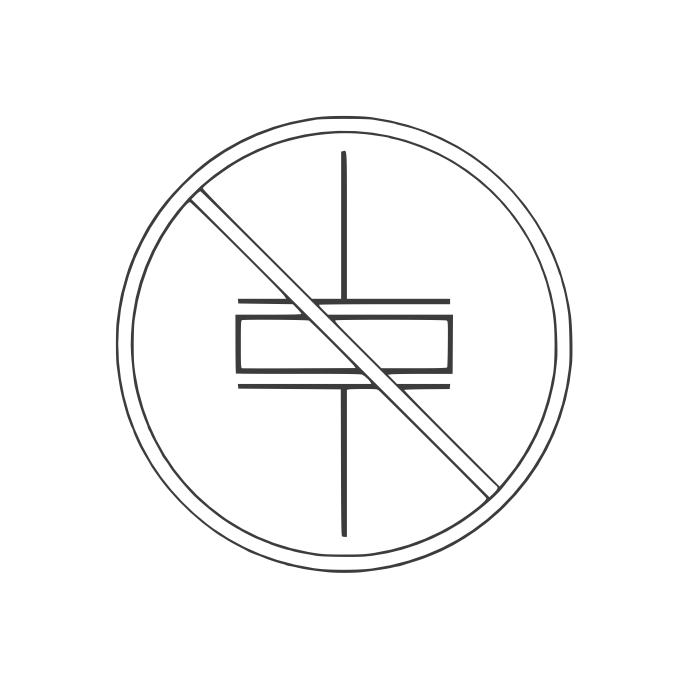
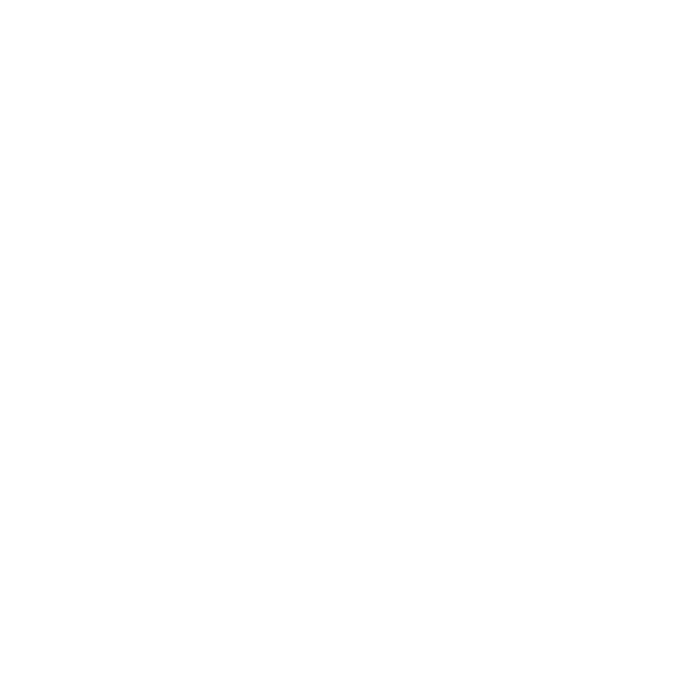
drawing: [115, 115, 573, 573] -> none

